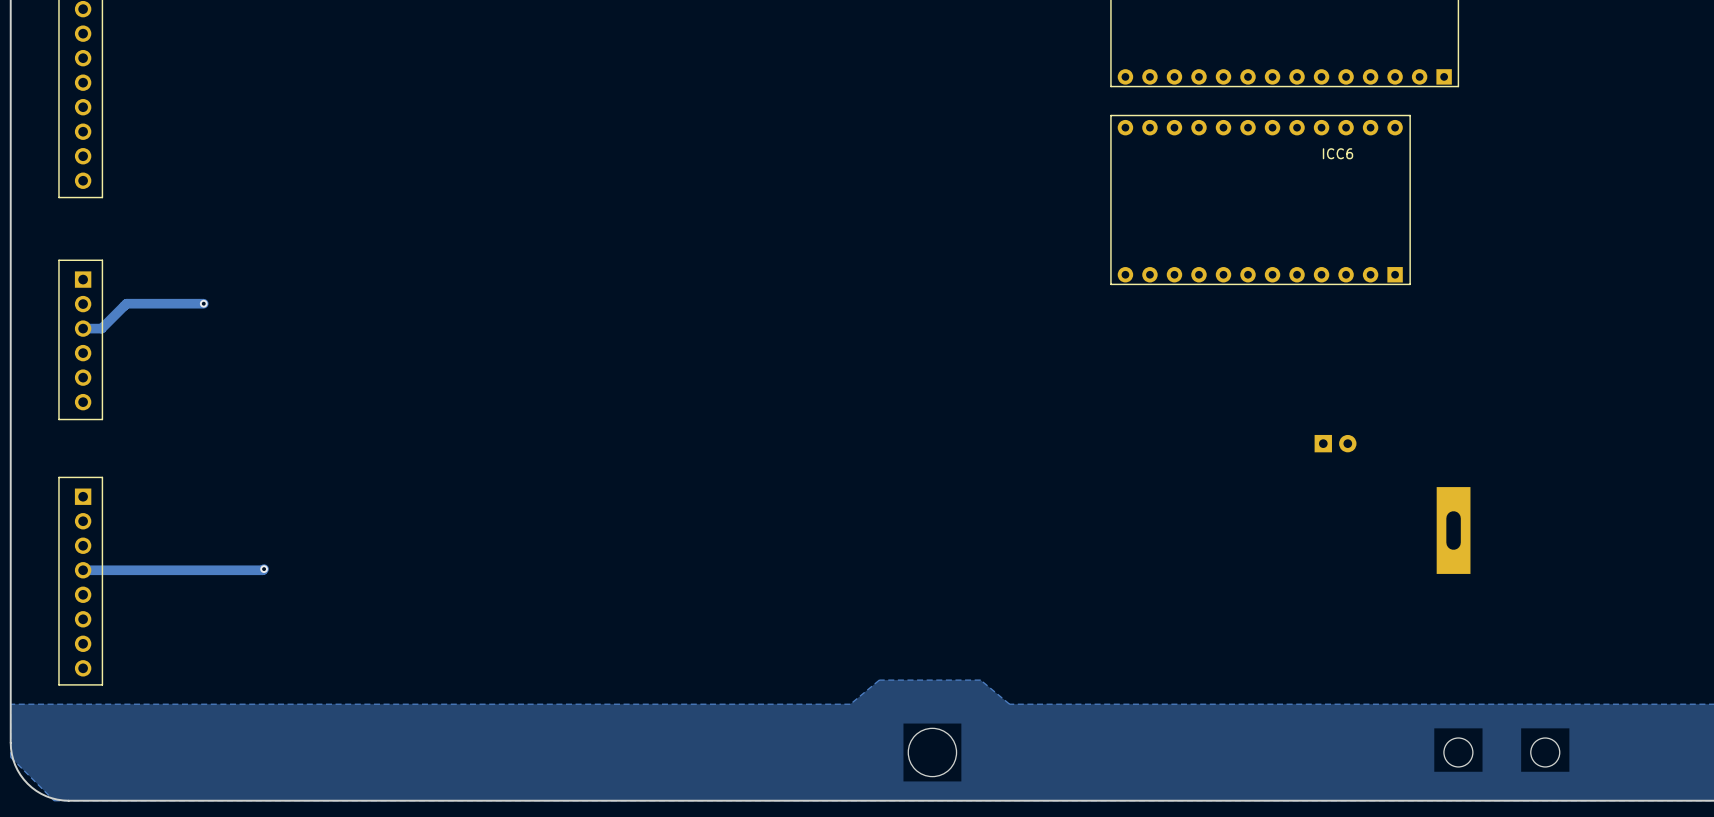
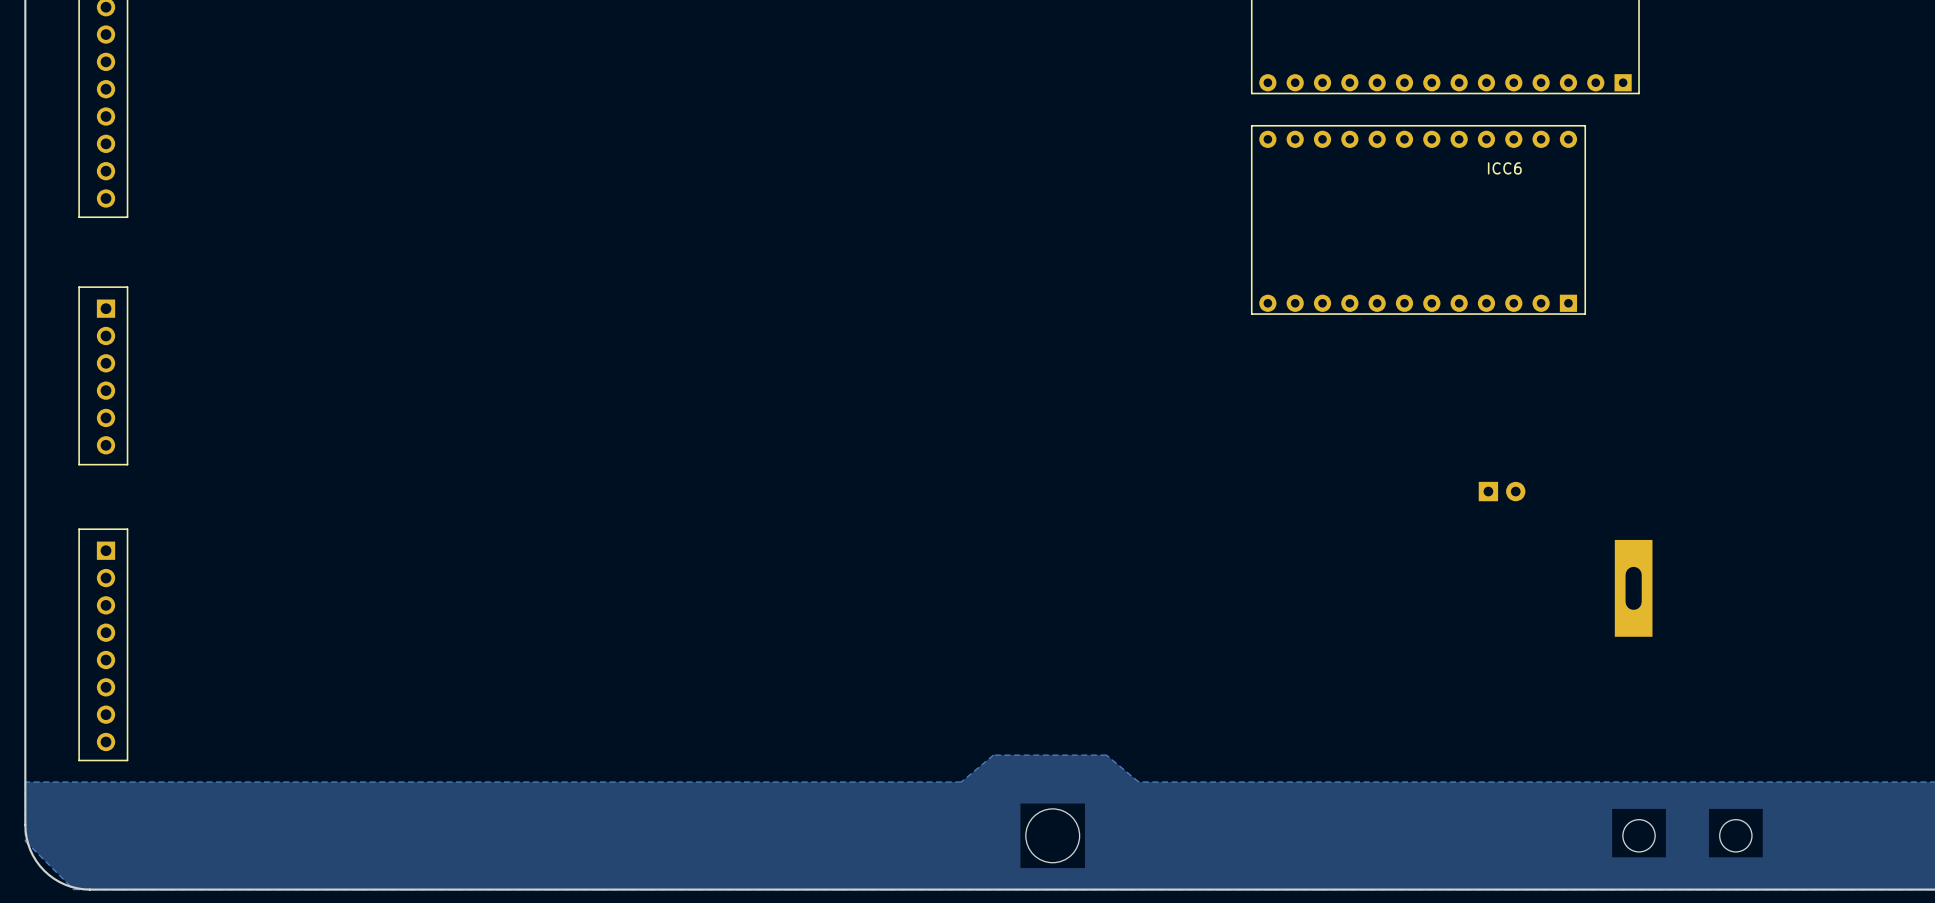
track: (203, 303) (126, 303) (101, 328) (83, 328) -> none
via: (203, 303) -> none
track: (264, 569) (83, 570) -> none
via: (264, 569) -> none

